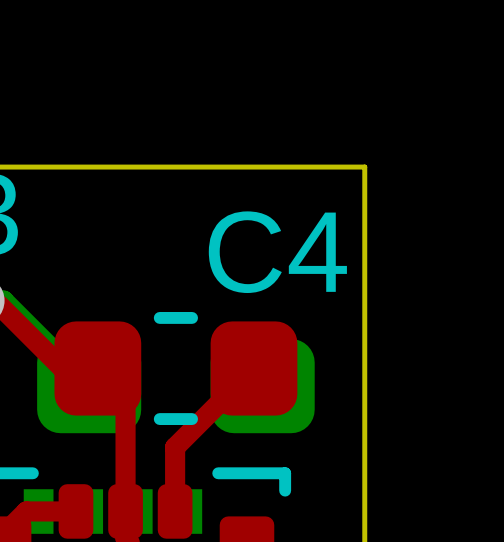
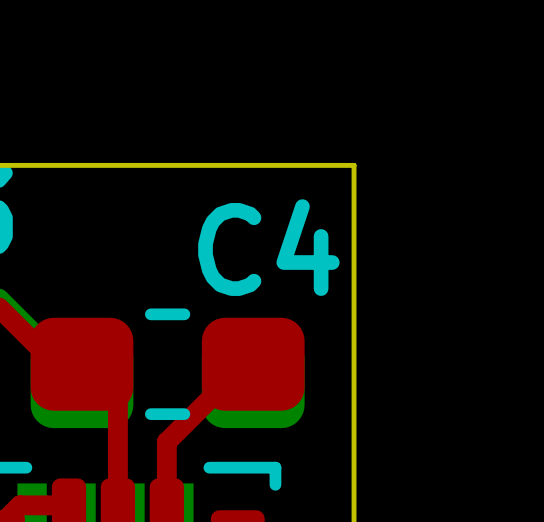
C4 footprint: [54, 311, 298, 426] -> [30, 308, 305, 421]

